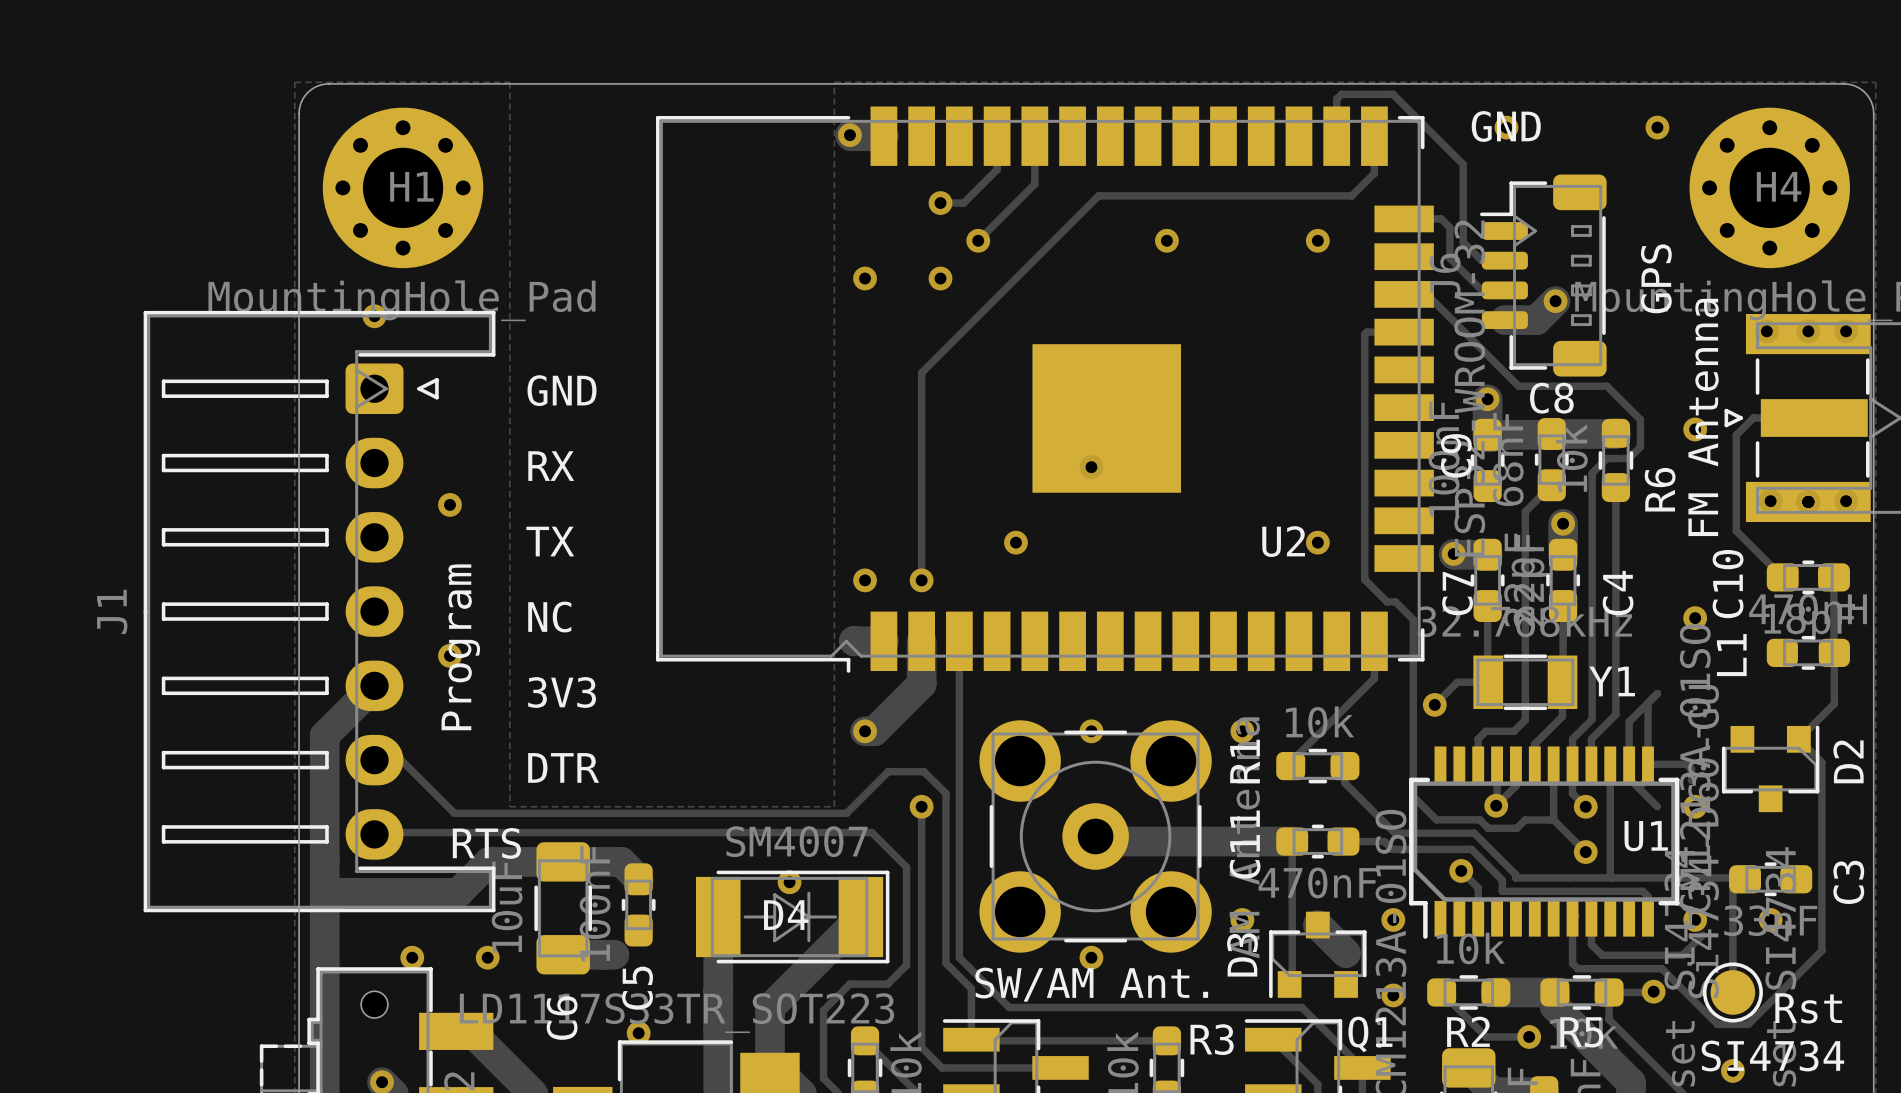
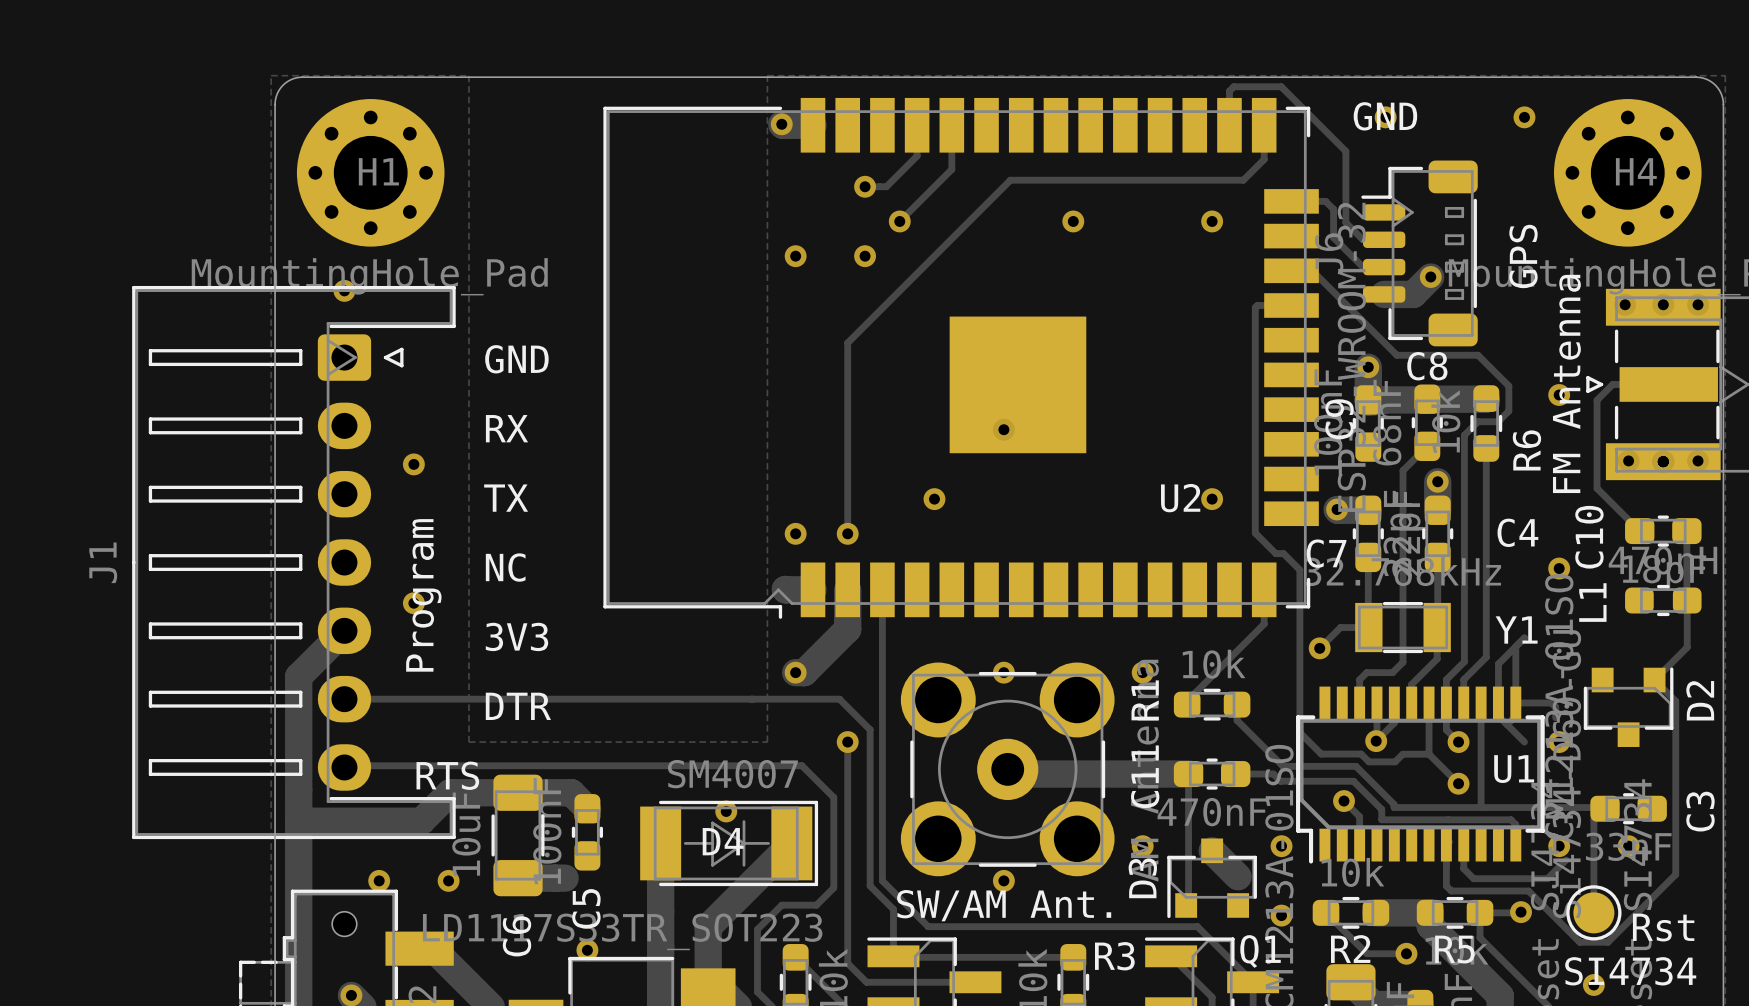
C7 name rotation: 0° (1457, 593) -> 90° clockwise (1326, 553)
C4 name rotation: 0° (1618, 593) -> 90° clockwise (1517, 532)
Y1 name position: Y1 (1612, 681) -> Y1 (1516, 629)
track: (401, 760) (454, 813) (846, 813) (888, 771) (923, 771) (946, 793) -> (369, 699) (839, 699) (870, 729)

